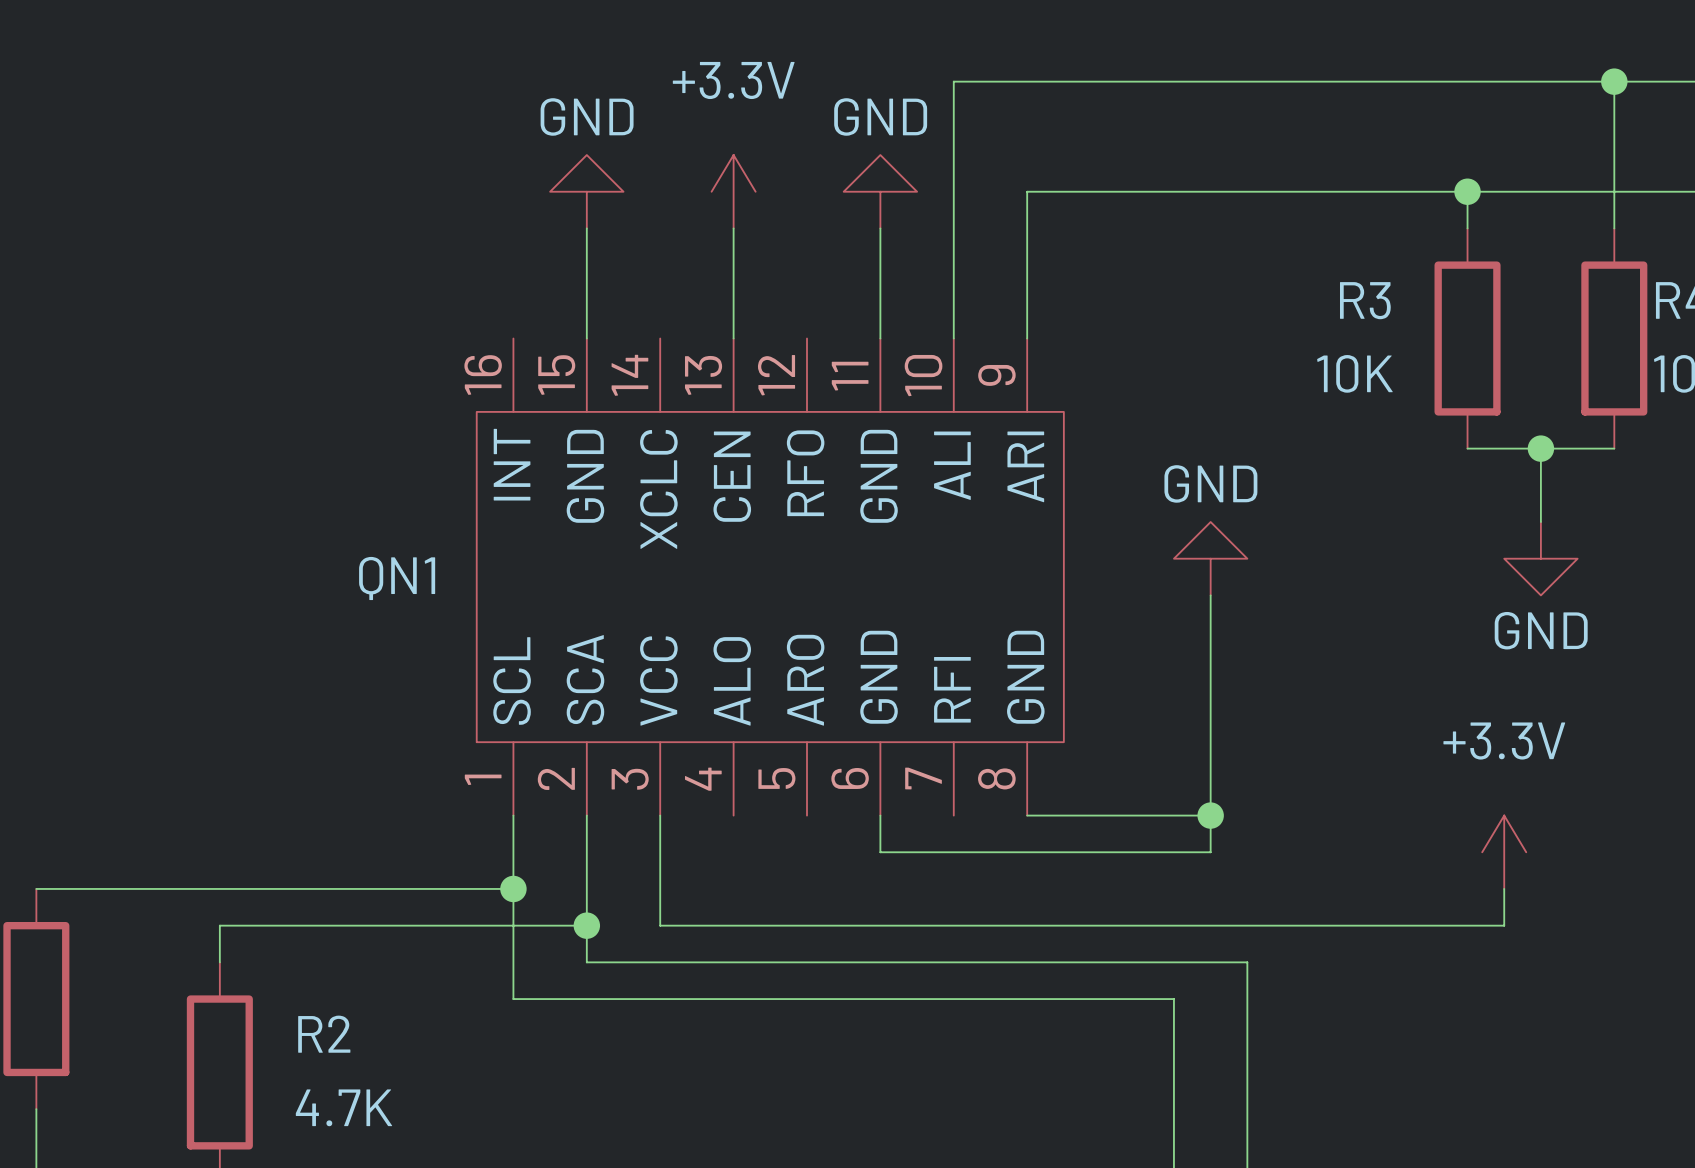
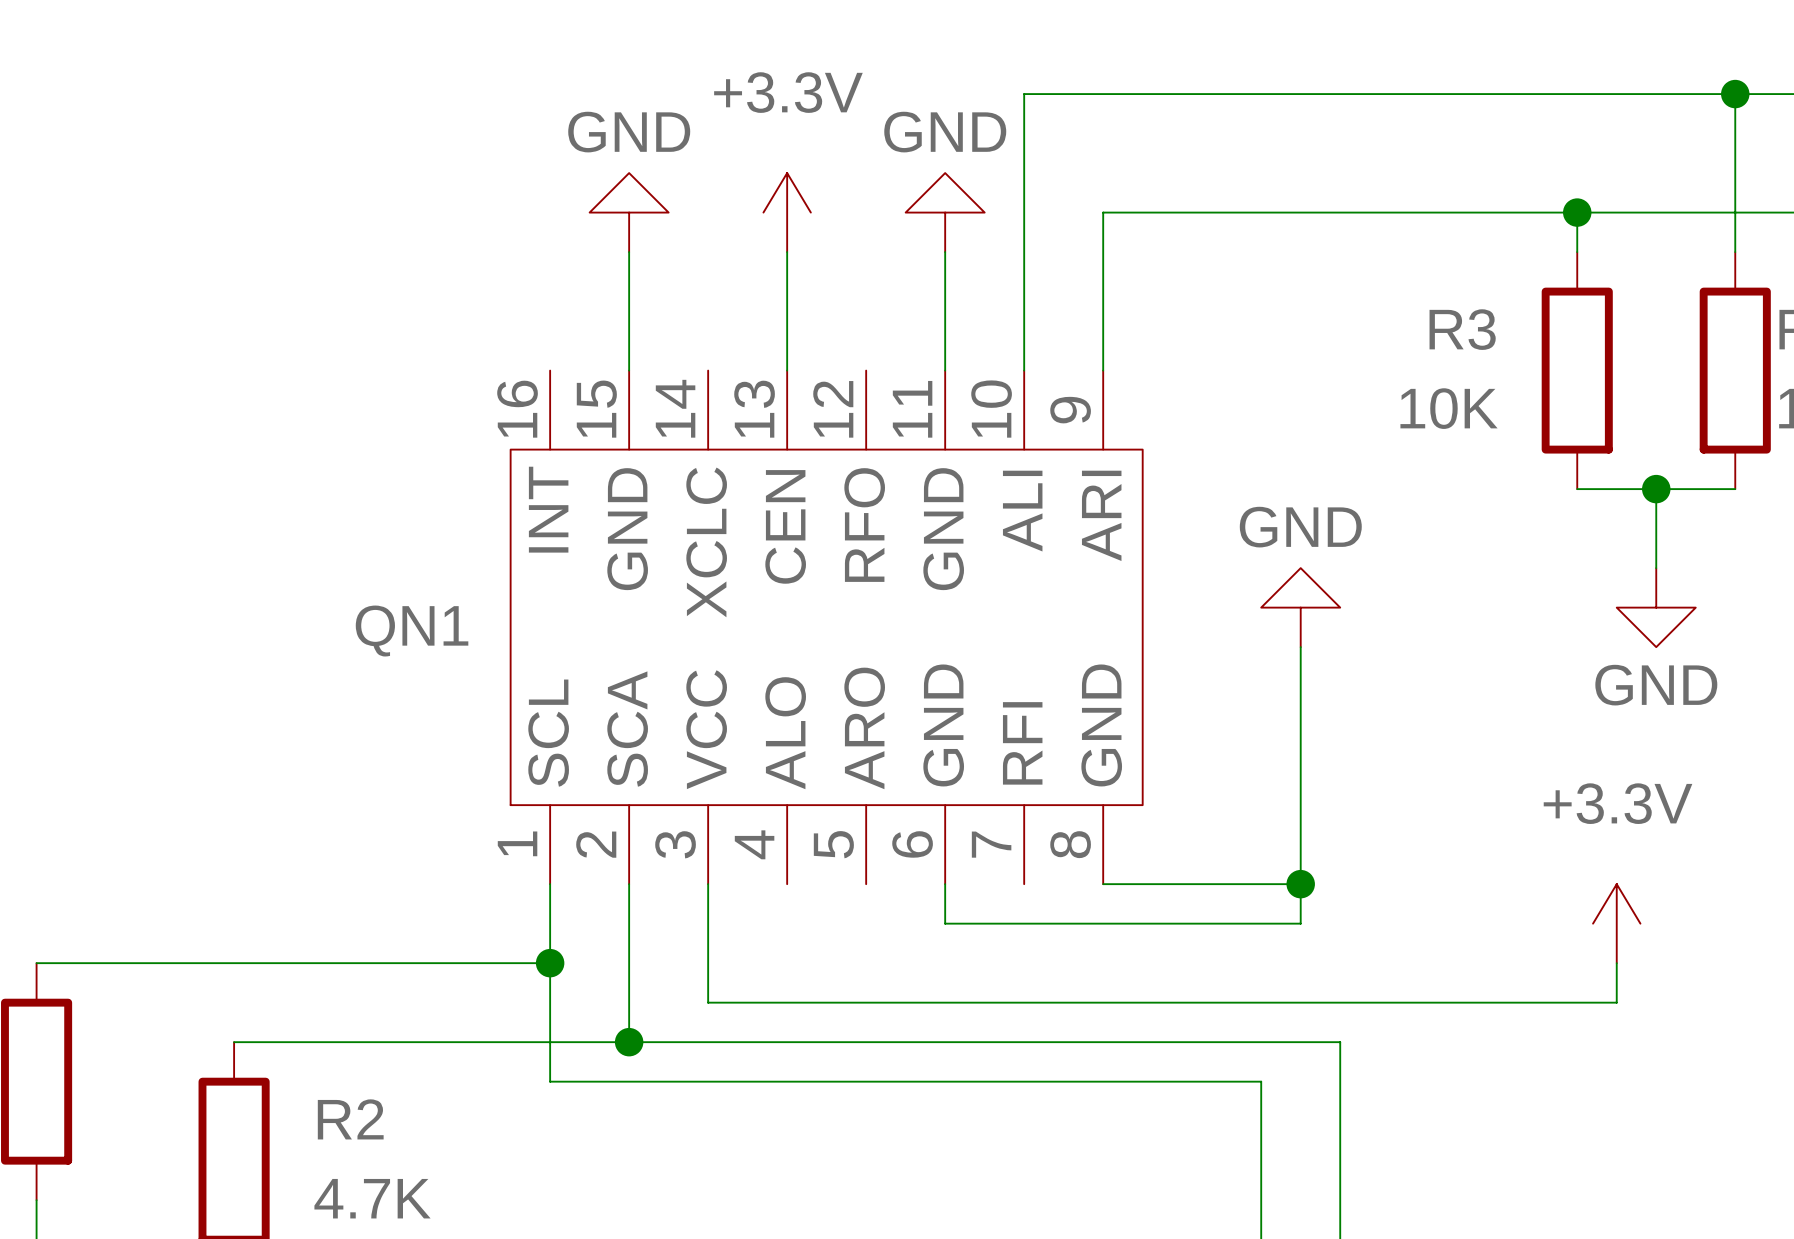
wire: (586, 925) (219, 925) (219, 962) -> (629, 1042) (234, 1042)
junction position: (586, 925) -> (629, 1042)

